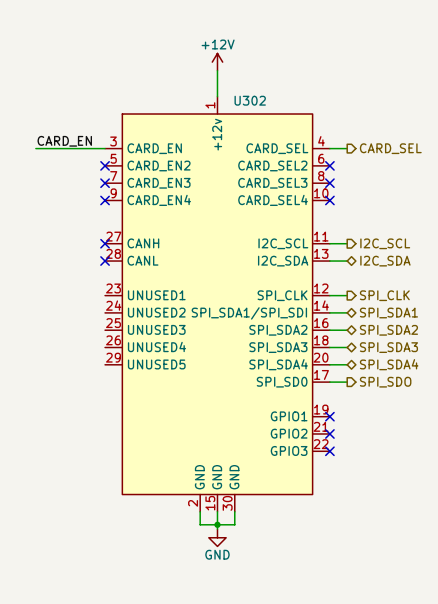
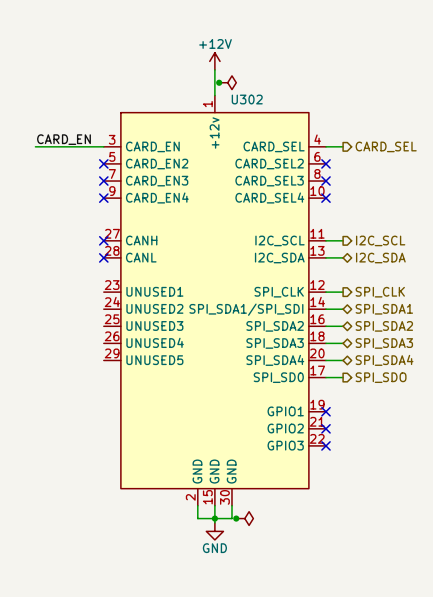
junction: none -> (219, 82)
power symbol: none -> (227, 82)
junction: none -> (236, 518)
power symbol: none -> (244, 518)

